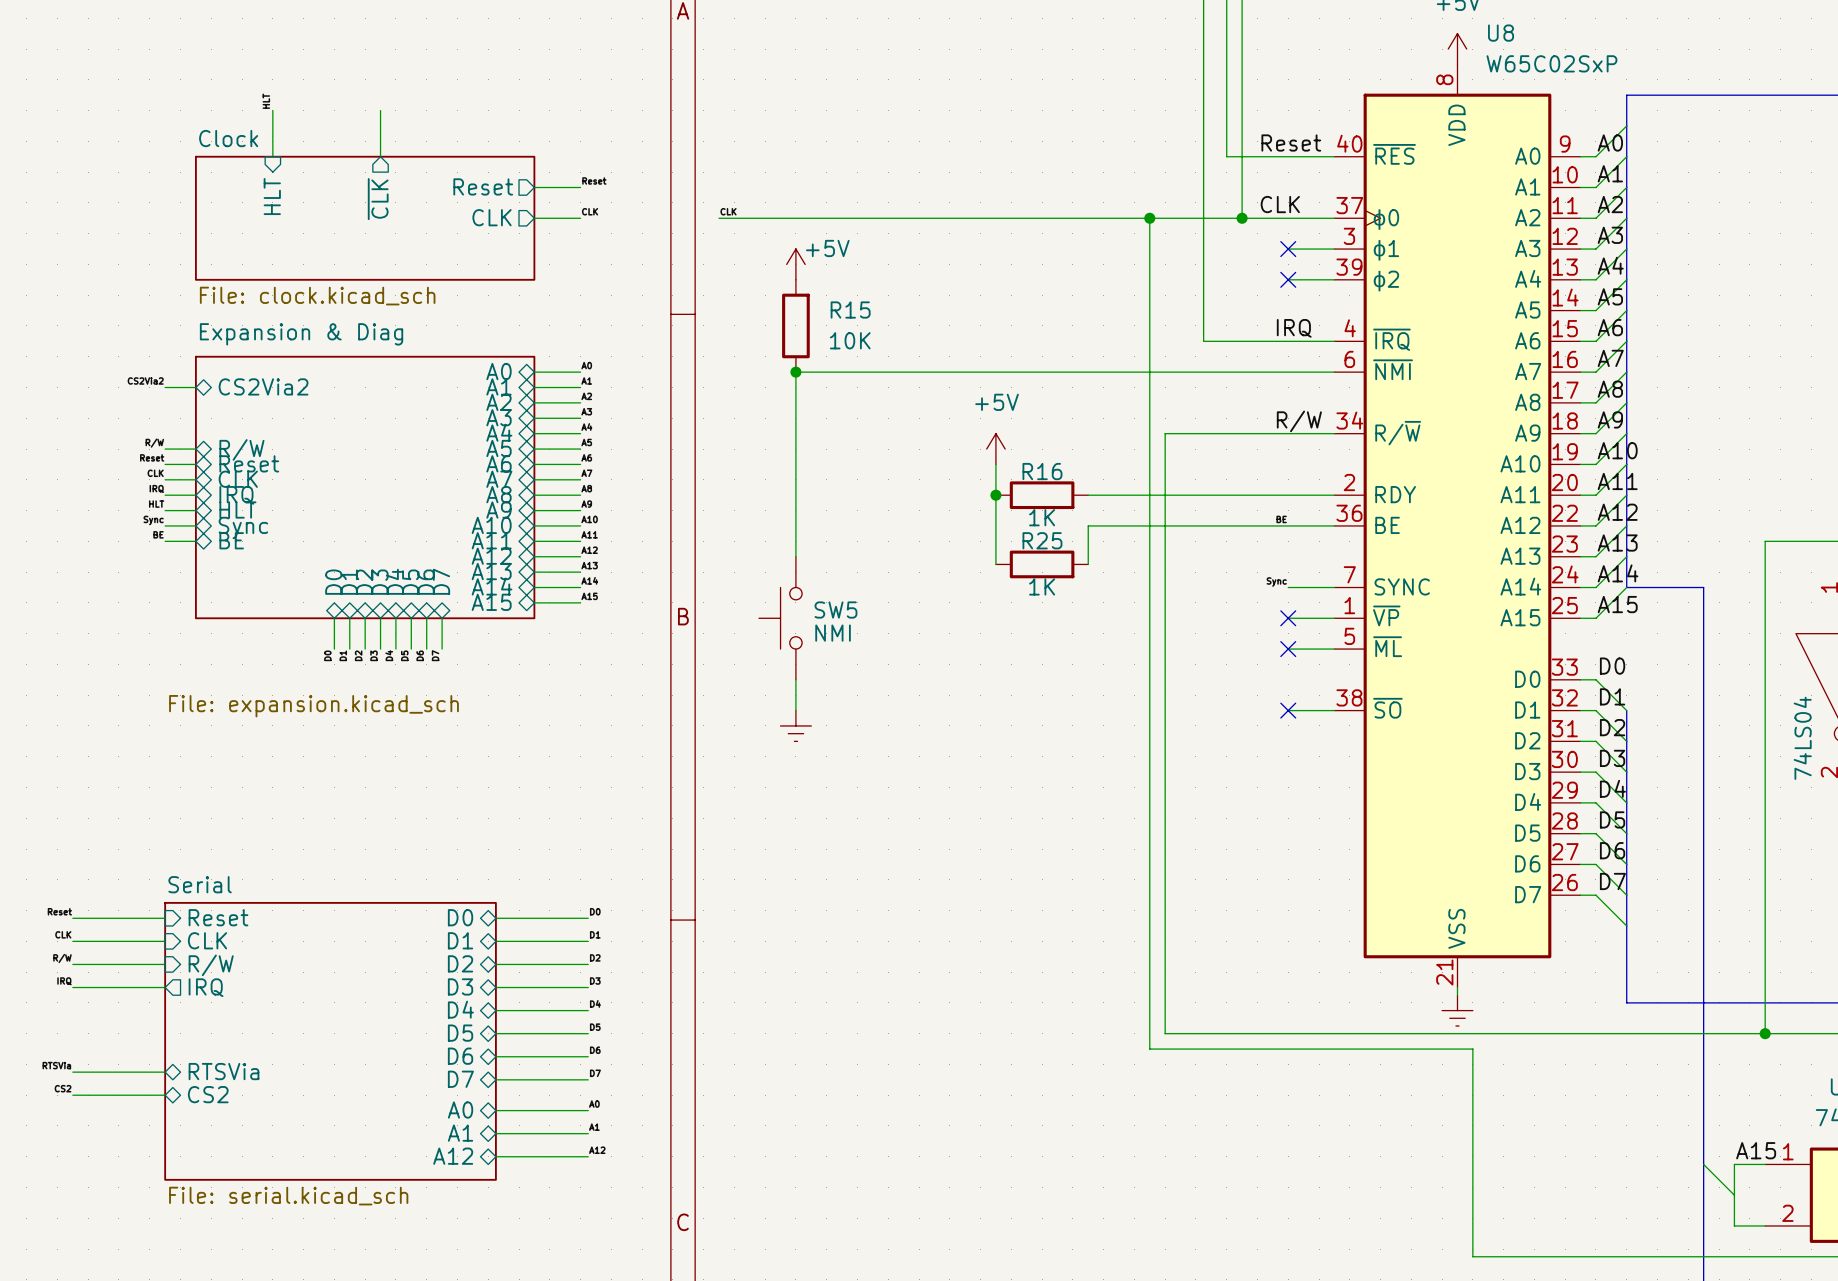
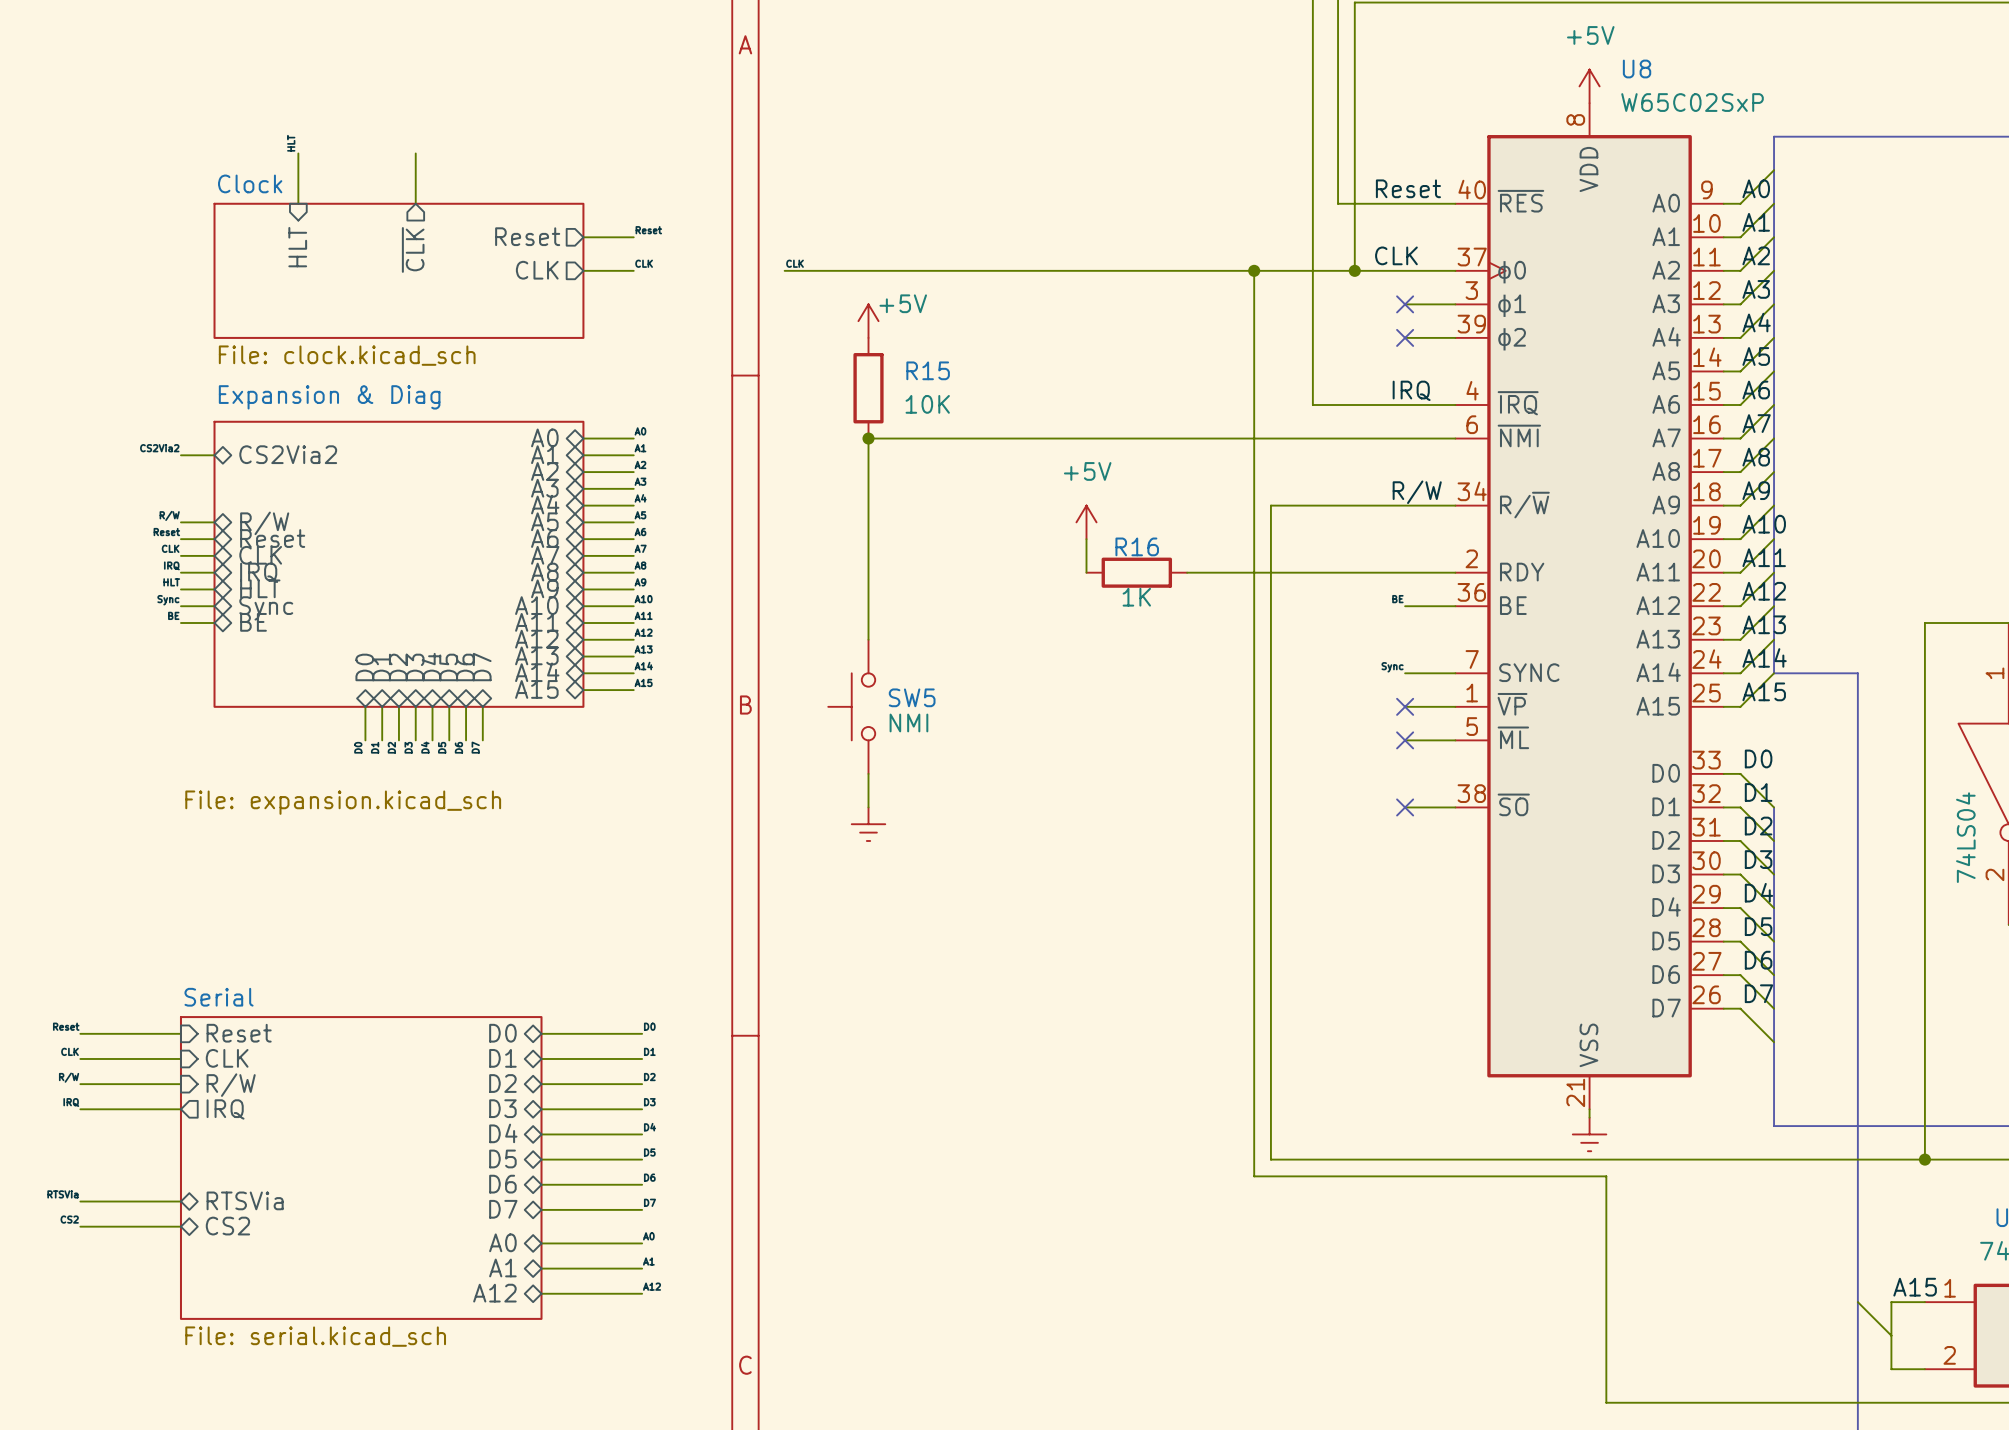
wire: (995, 495) (995, 564) -> none
junction: (995, 495) -> none
wire: (1288, 525) (1088, 525) (1088, 564) -> none
R25: 1K (1042, 564) -> none

